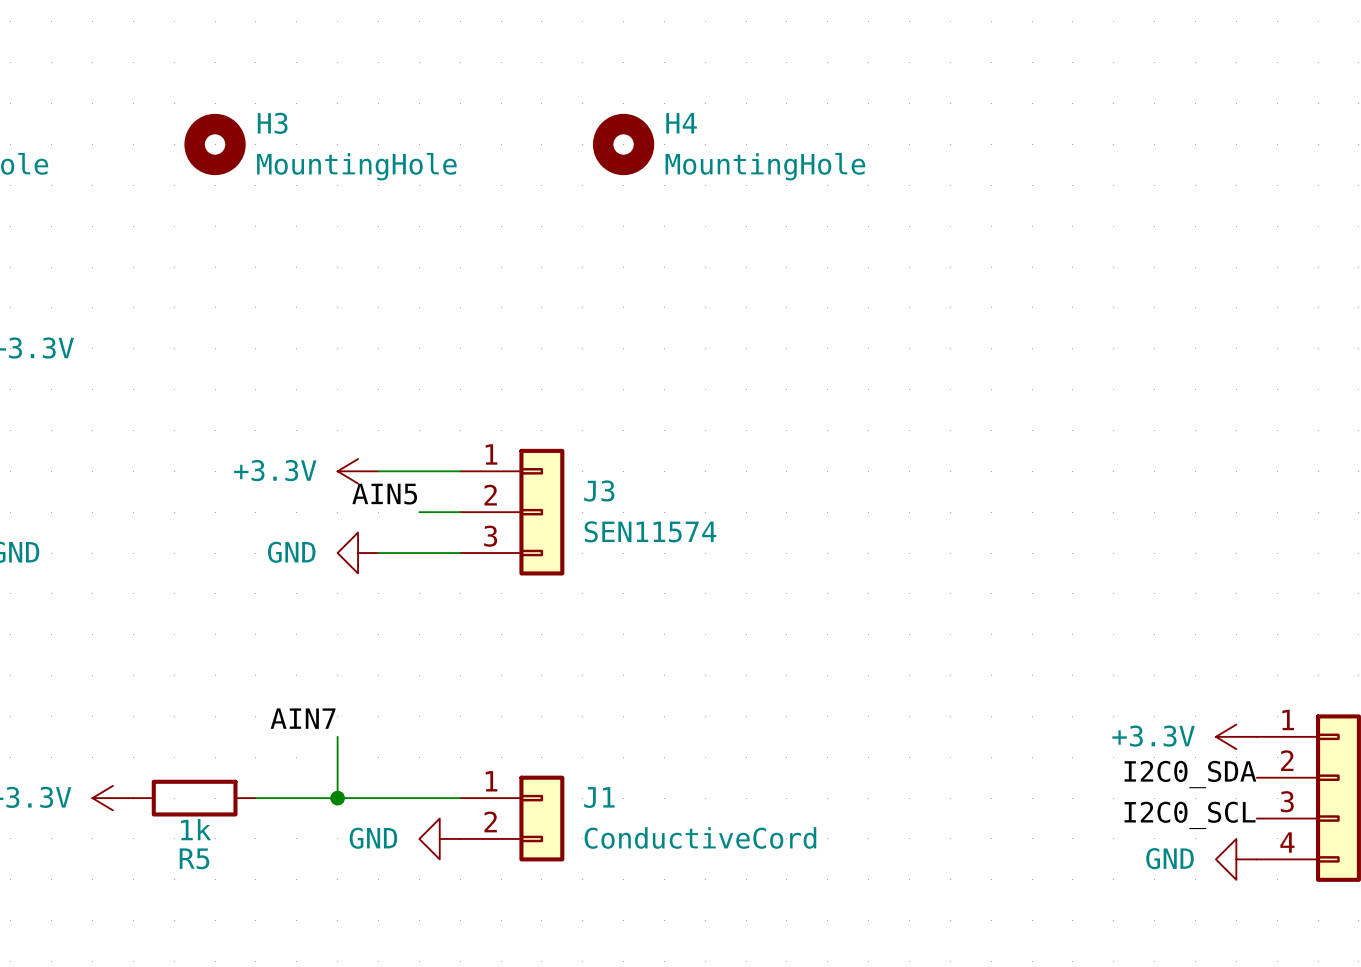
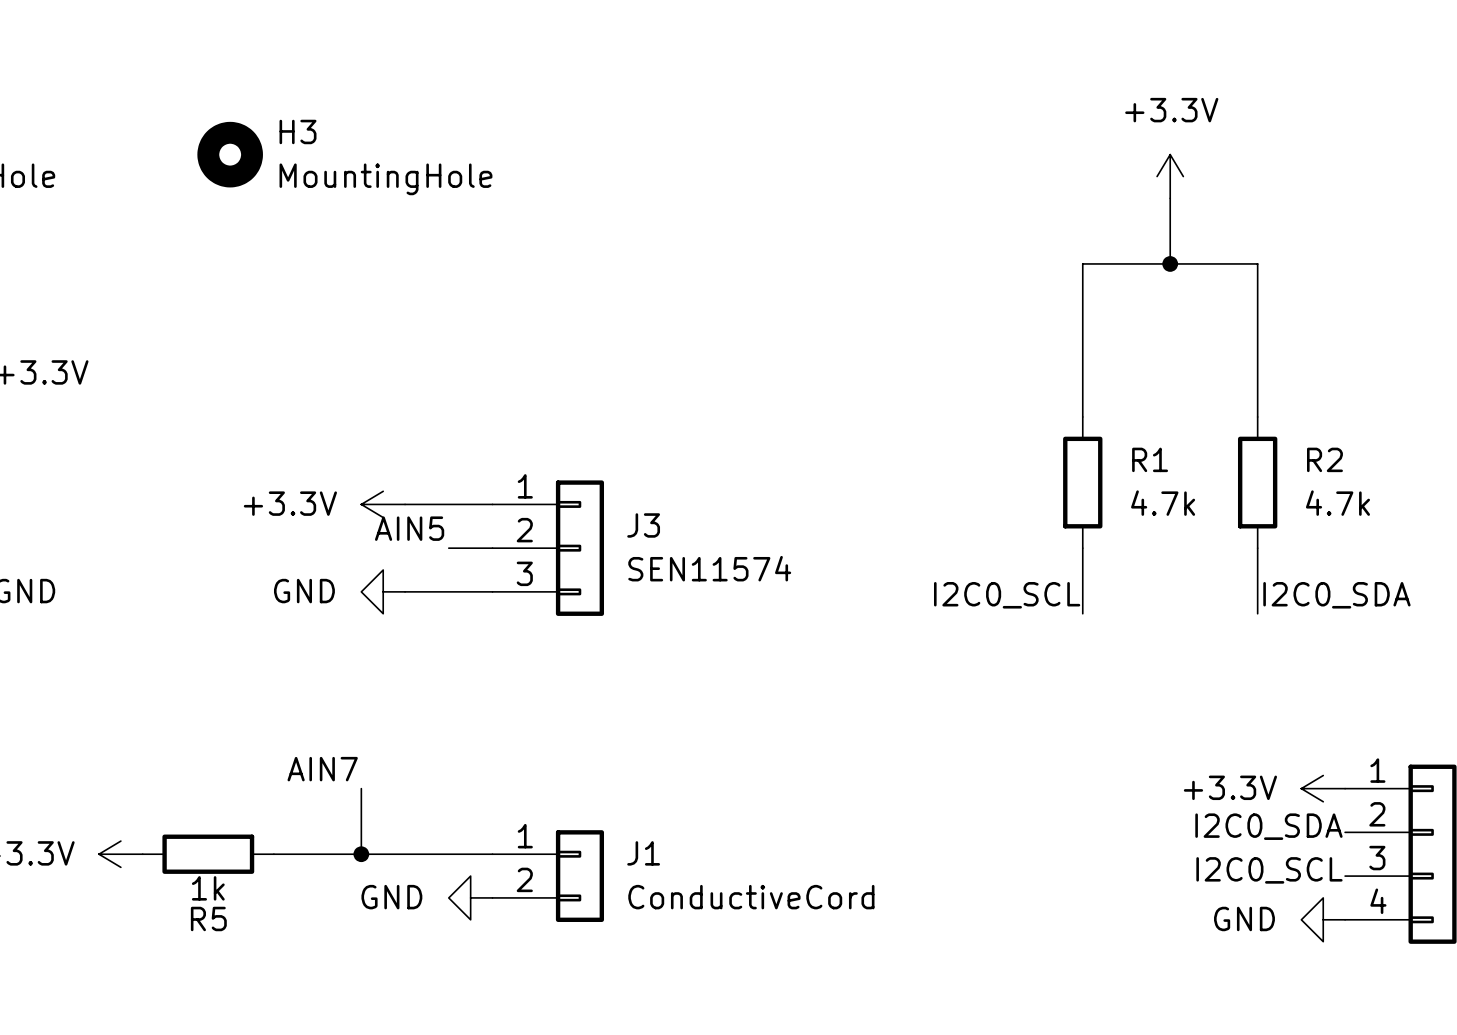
H4: MountingHole (623, 144) -> none
power symbol: none -> +3.3V (1170, 176)
wire: none -> (1170, 198) (1170, 263)
junction: none -> (1170, 263)
wire: none -> (1082, 416) (1082, 263) (1257, 263) (1257, 416)
R1: none -> 4.7k (1082, 482)
R2: none -> 4.7k (1257, 482)
wire: none -> (1082, 548) (1082, 613)
wire: none -> (1257, 548) (1257, 613)
label: none -> I2C0_SCL (1007, 595)
label: none -> I2C0_SDA (1336, 595)

